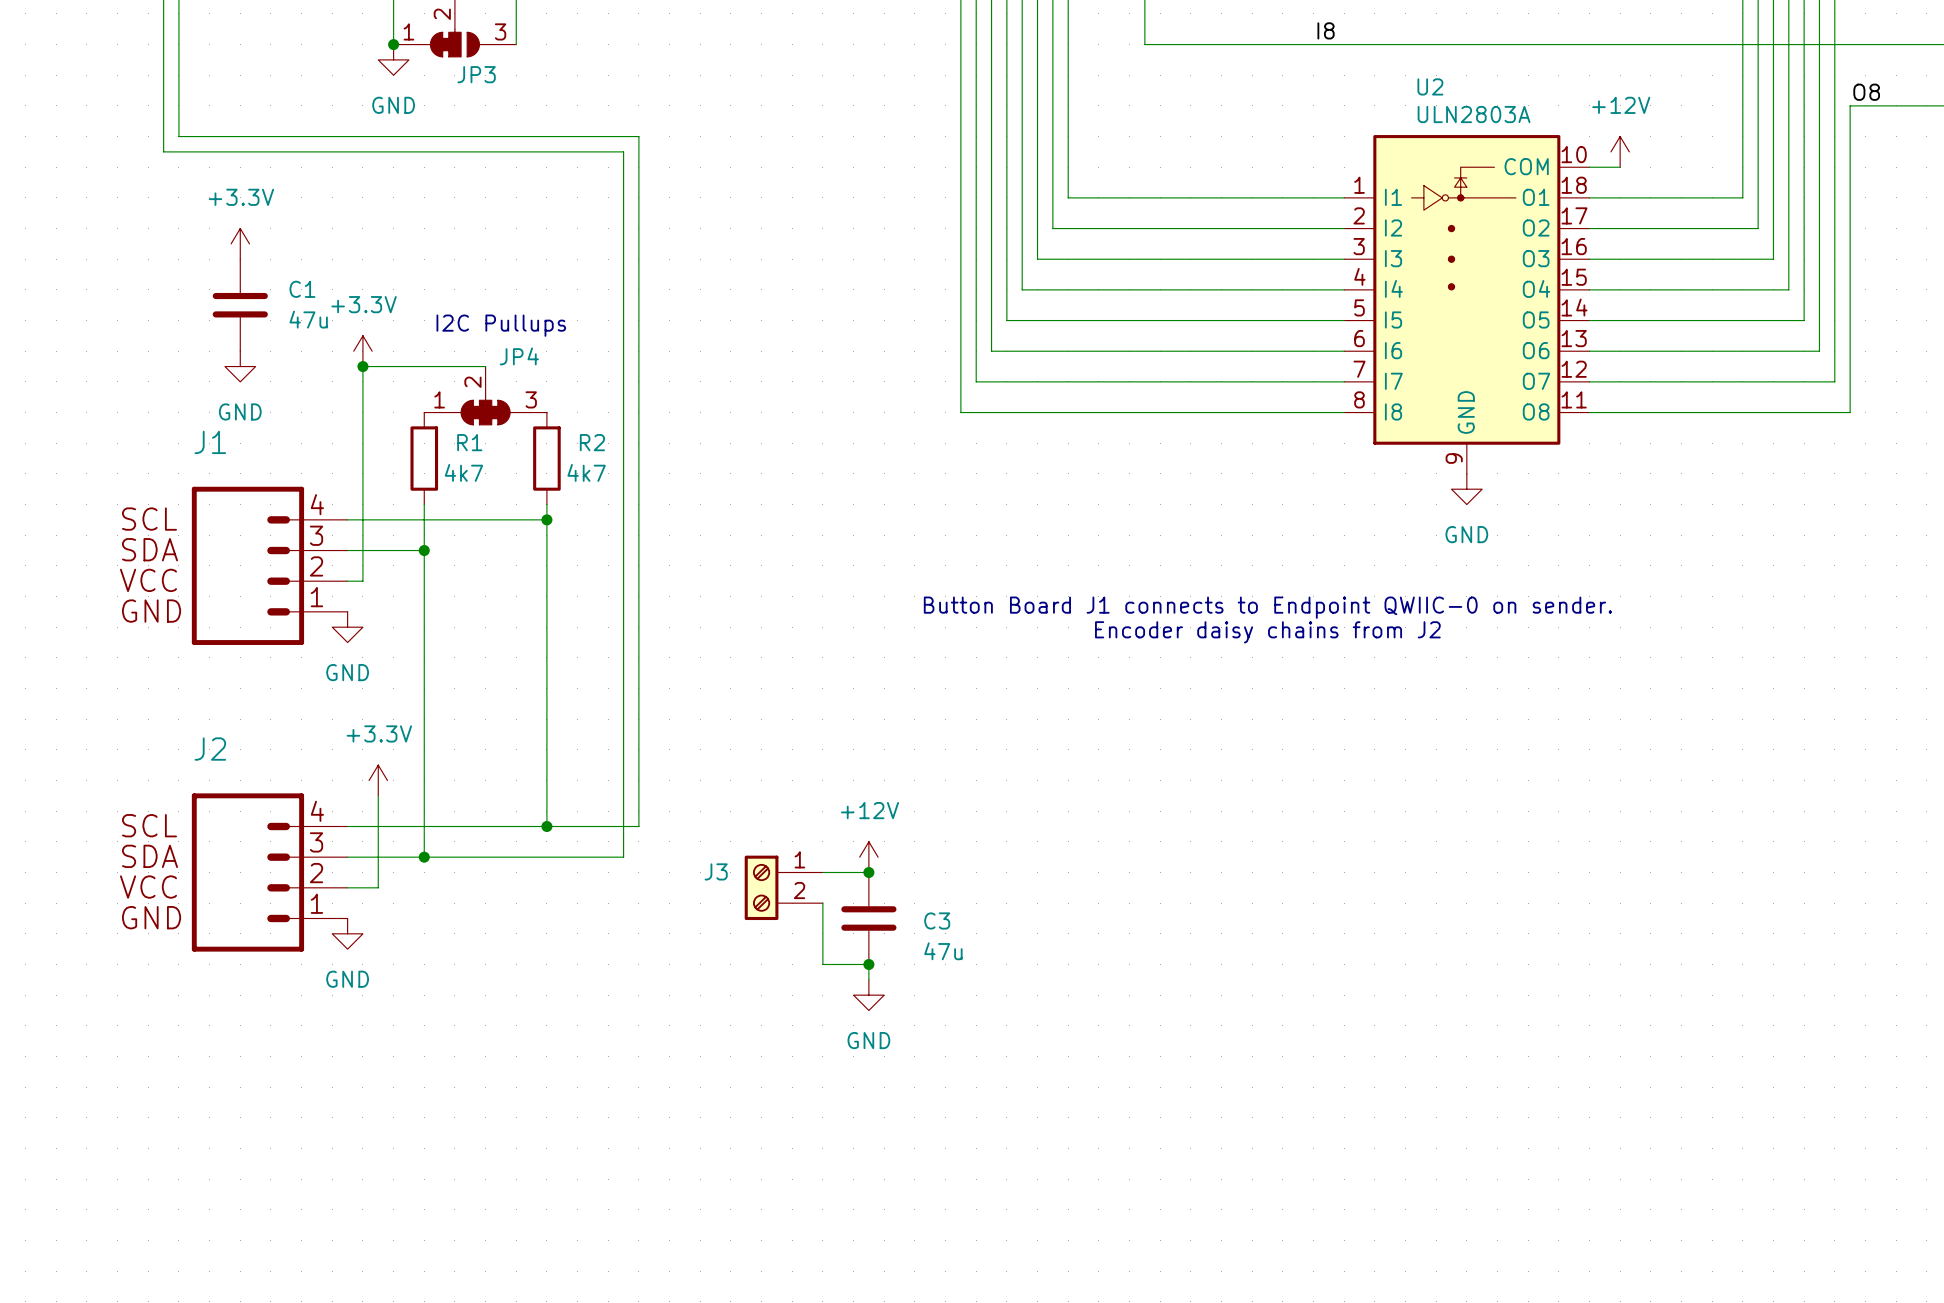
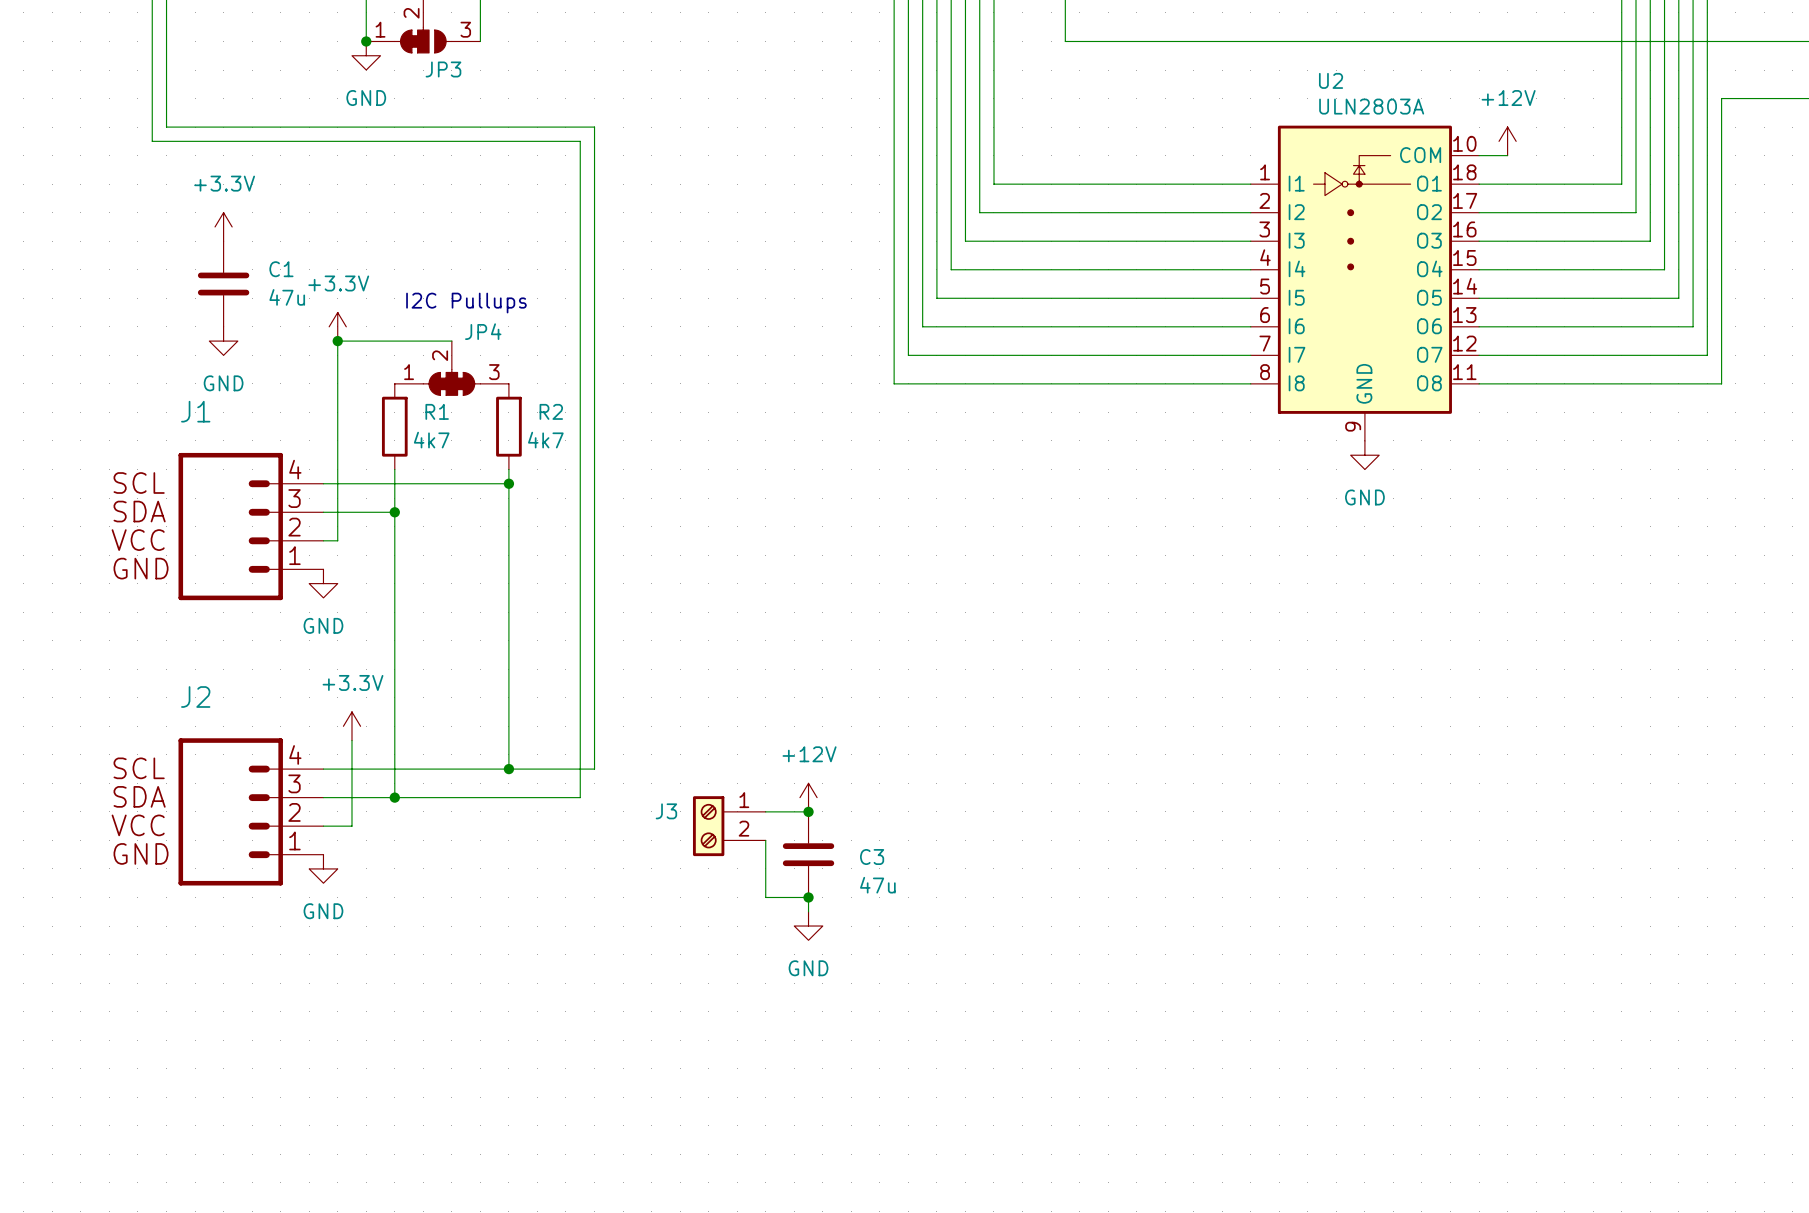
label: I8 (1326, 30) -> none
label: O8 (1866, 92) -> none
text: Button Board J1 connects to Endpoint QWIIC-0 on sender. (1267, 607) -> none
text: Encoder daisy chains from J2 (1267, 632) -> none

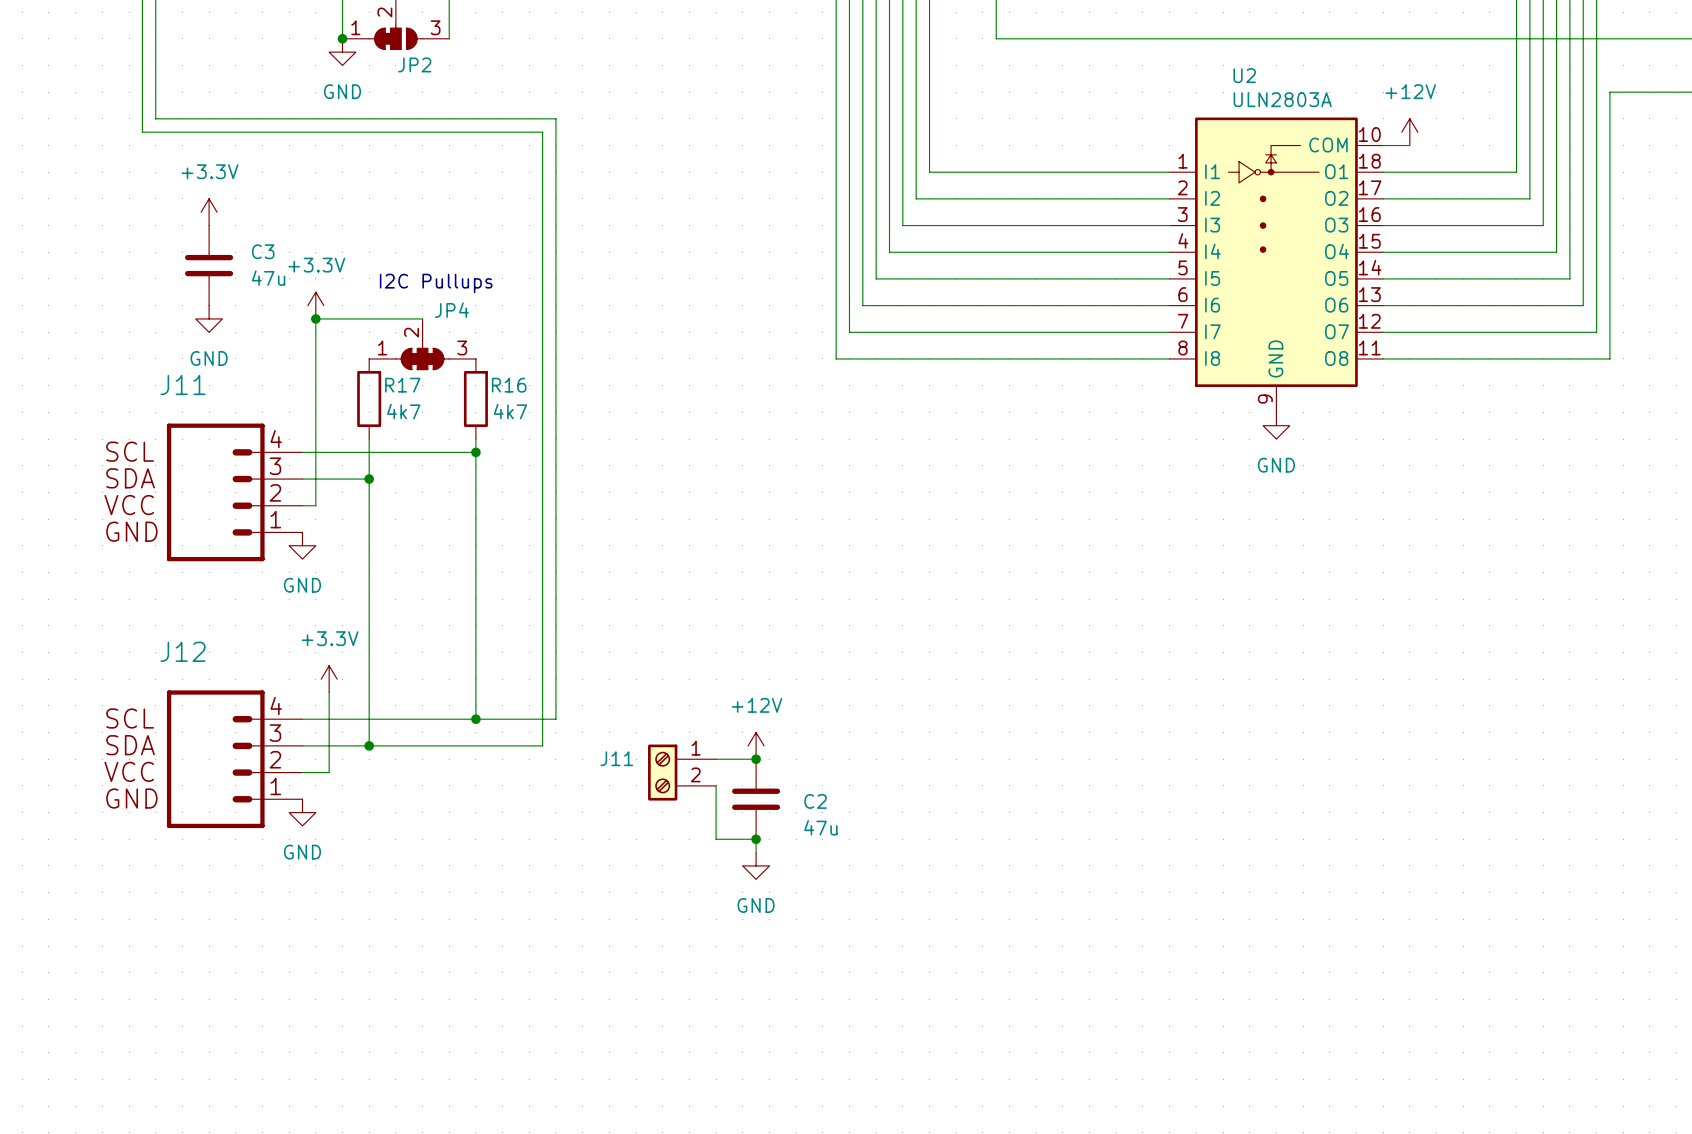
JP3 name: JP3 (443, 69) -> JP2 (414, 64)
C1 name: C1 (281, 269) -> C3 (263, 251)
J1 name: J1 (195, 411) -> J11 (183, 384)
R1 name: R1 (437, 411) -> R17 (402, 385)
R2 name: R2 (551, 411) -> R16 (509, 385)
J2 name: J2 (195, 697) -> J12 (183, 651)
J3 name: J3 (666, 811) -> J11 (616, 758)
C3 name: C3 (872, 857) -> C2 (815, 801)

